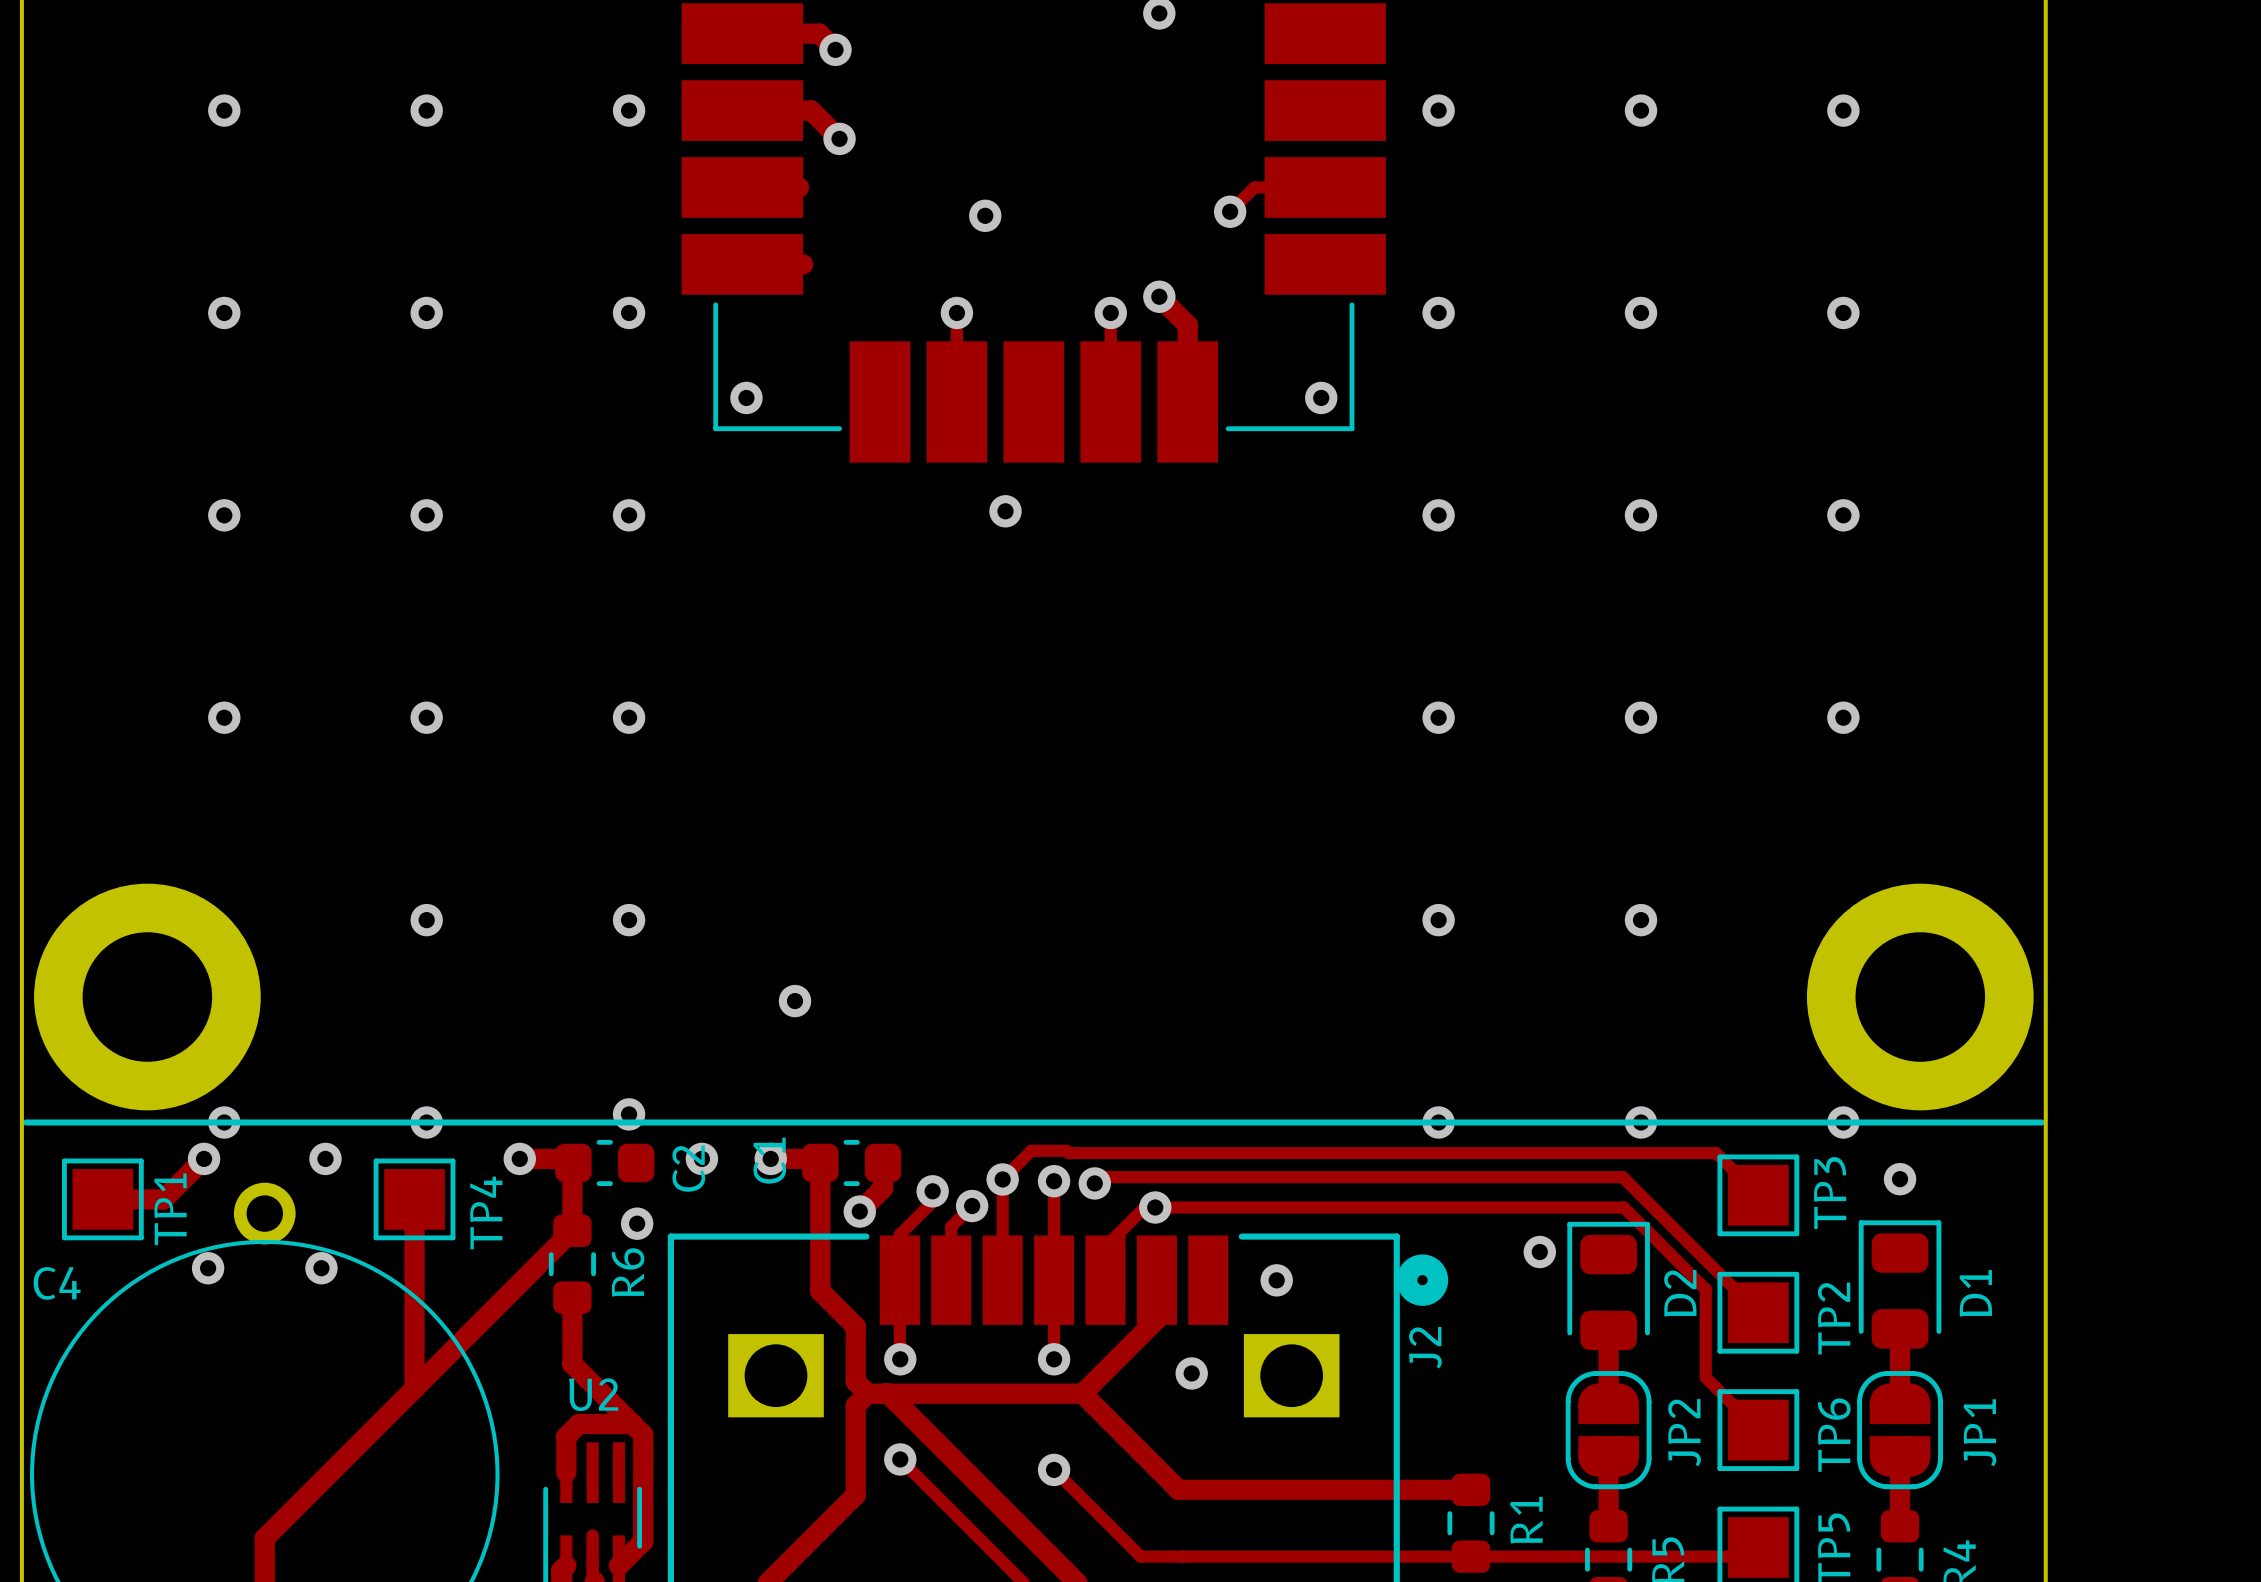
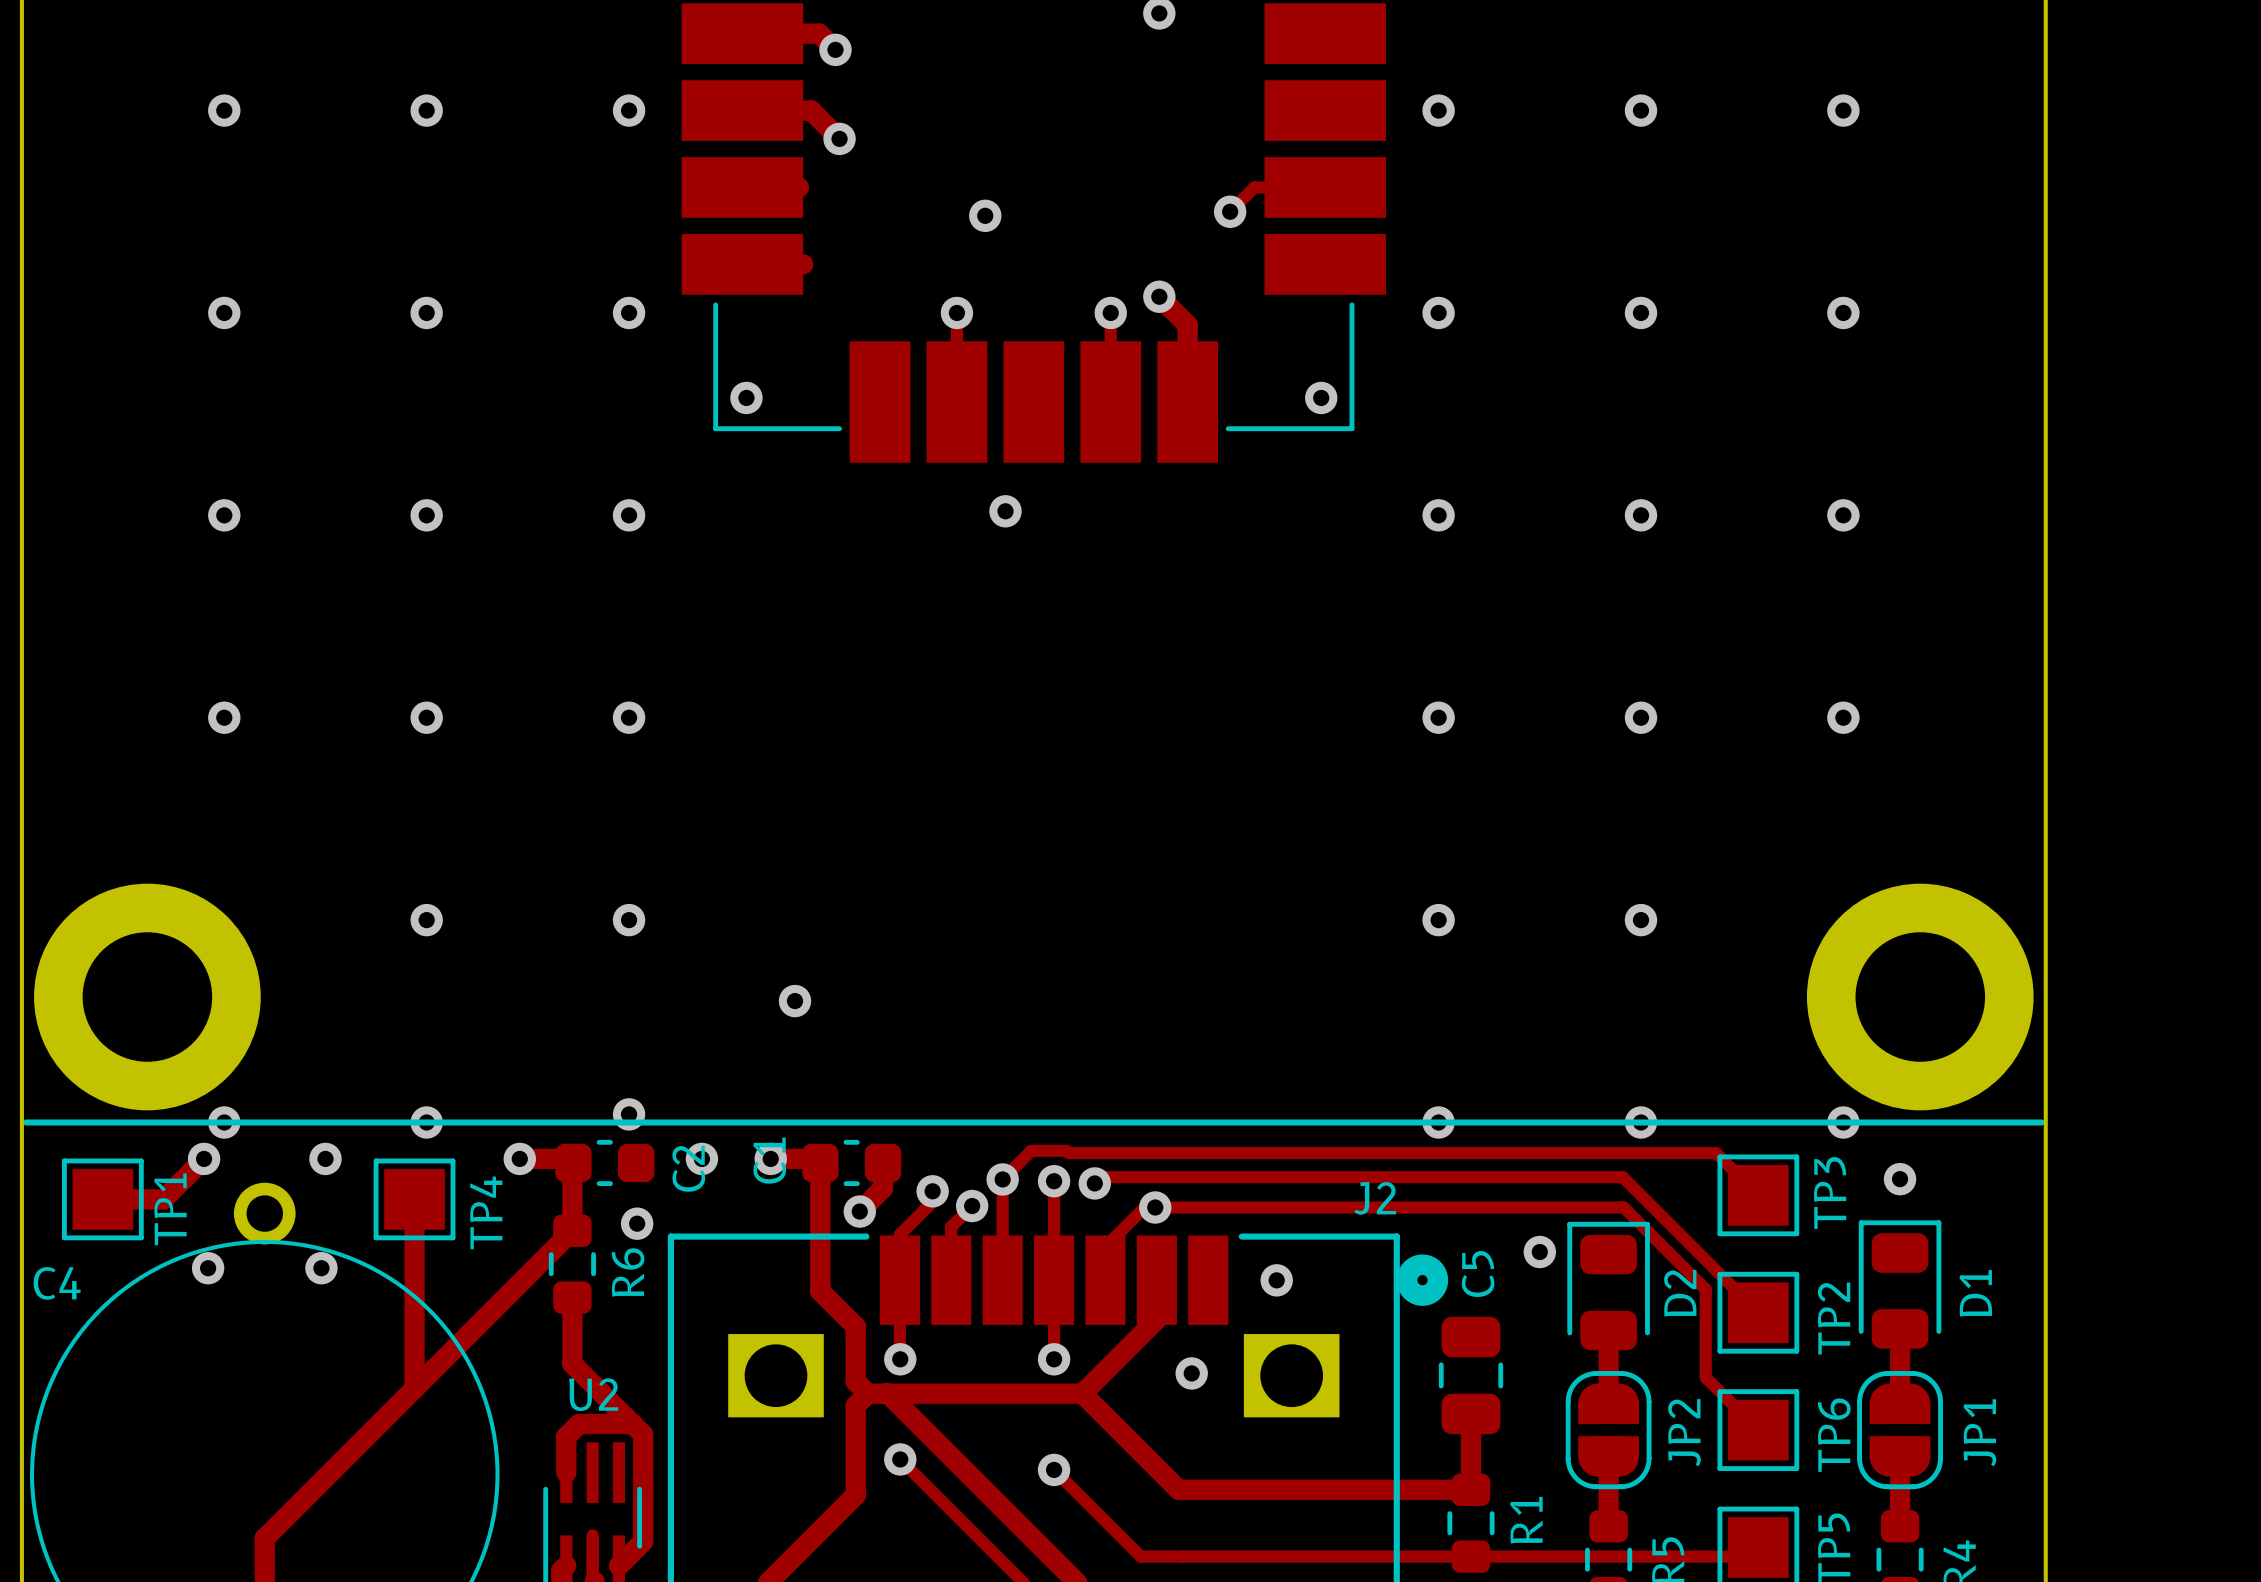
J2 name rotation: 0° (1425, 1347) -> 90° clockwise (1375, 1198)
J2 name position: J2 (1425, 1347) -> J2 (1375, 1198)
C5: none -> (1470, 1375)
track: none -> (1470, 1413) (1470, 1489)

